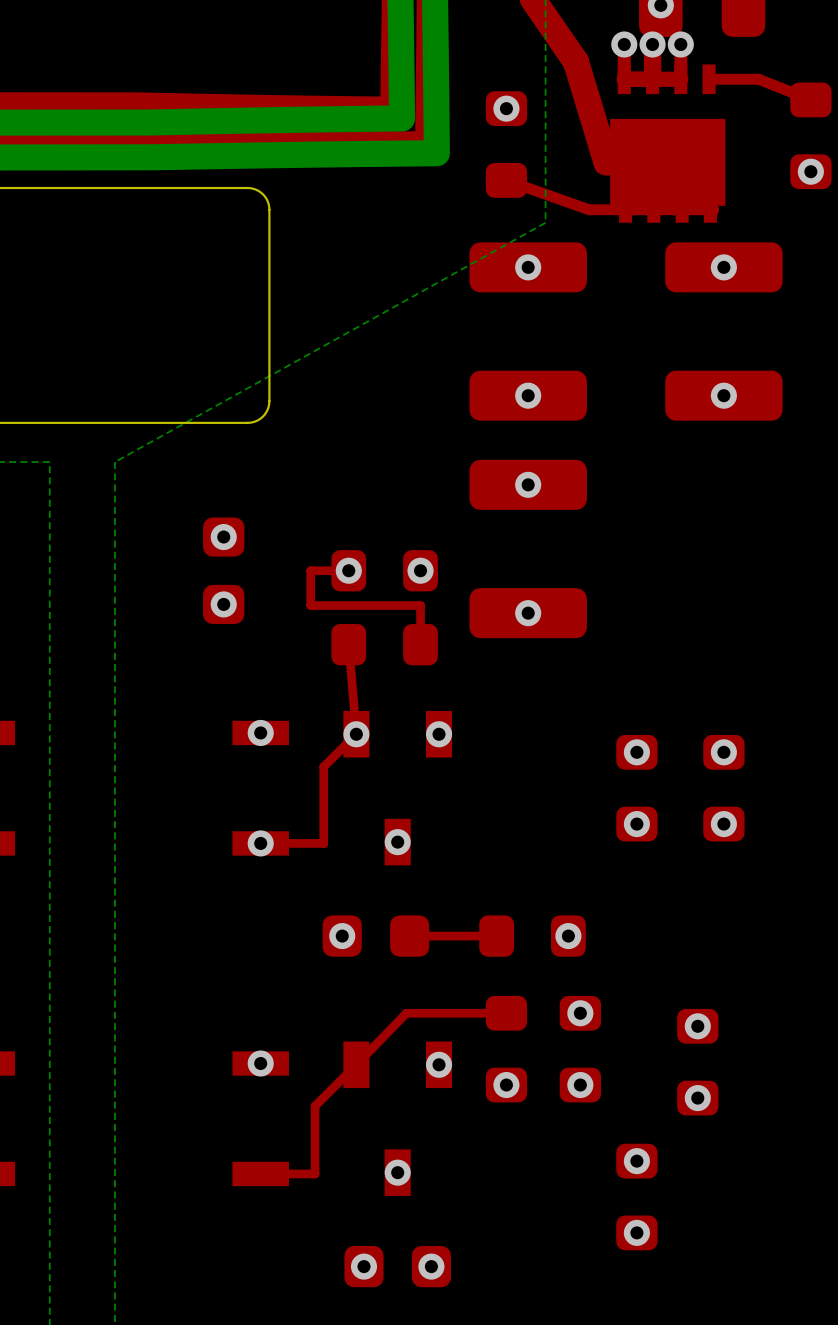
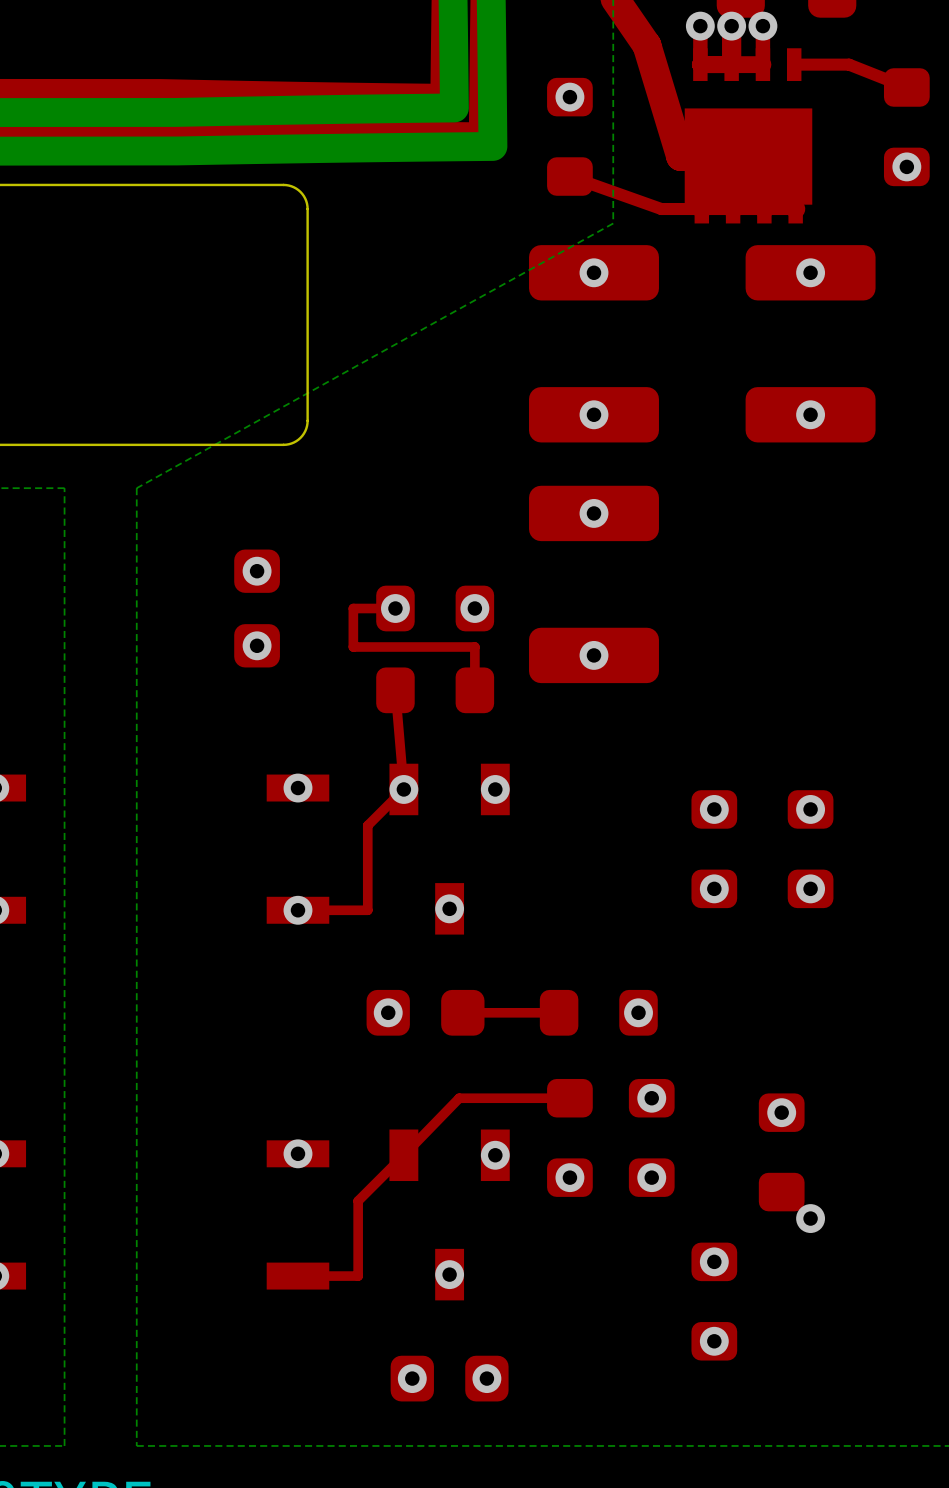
via position: (697, 1098) -> (810, 1218)

